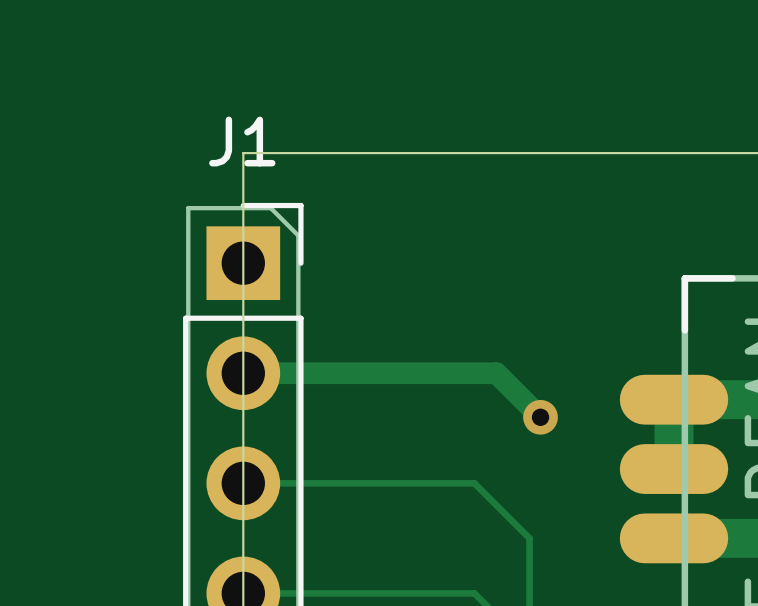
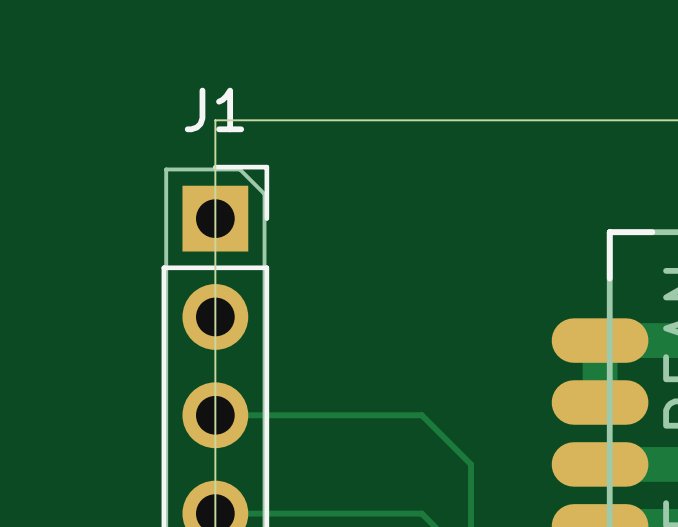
track: (261, 373) (496, 373) (540, 417) -> none
via: (540, 417) -> none

